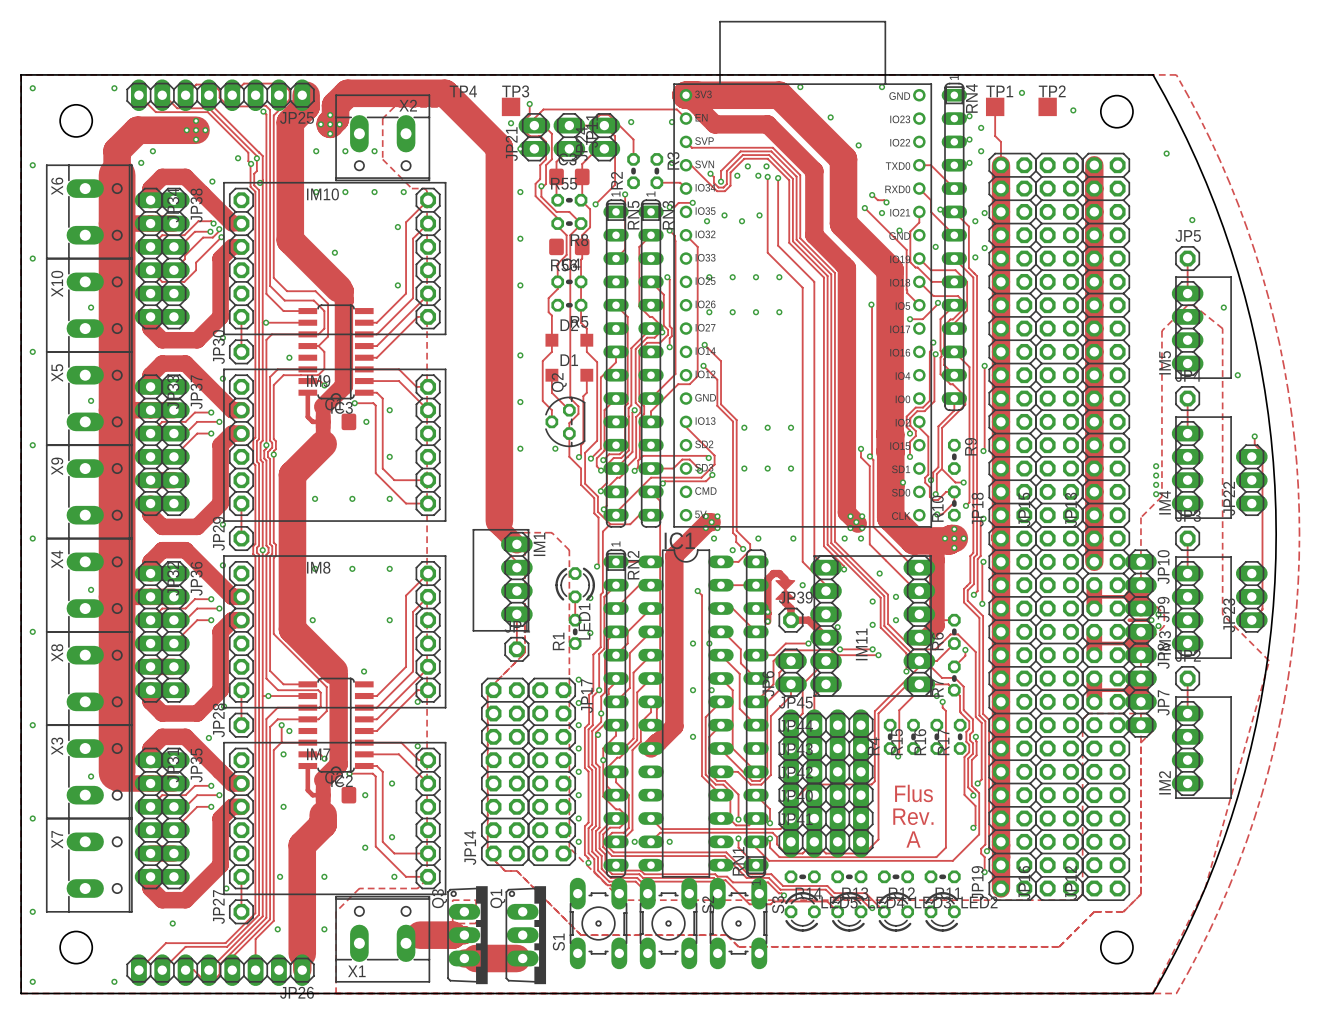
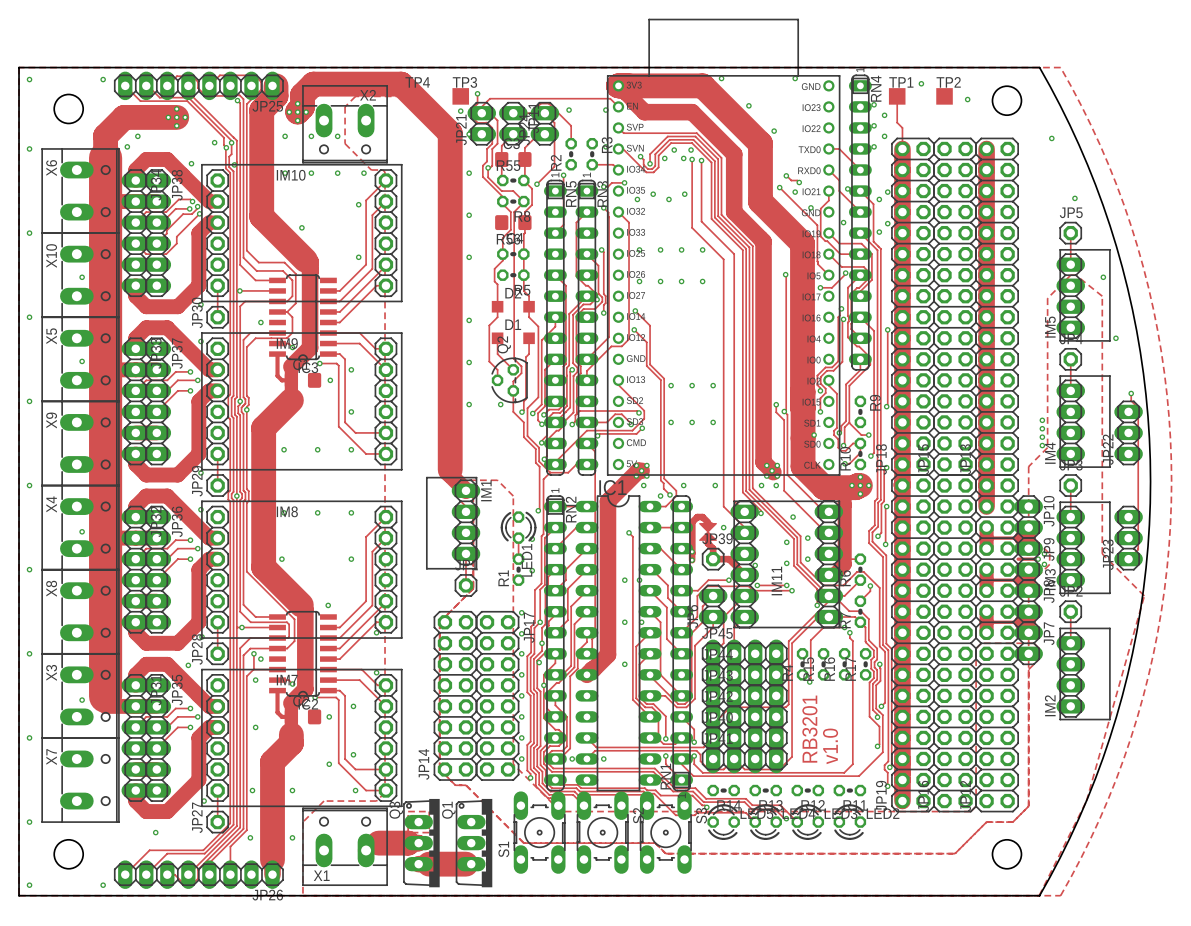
text: Flus (913, 793) -> none
text: none -> RB3201 (809, 729)
text: Rev. (913, 816) -> none
text: A (913, 839) -> v1.0 (830, 746)

